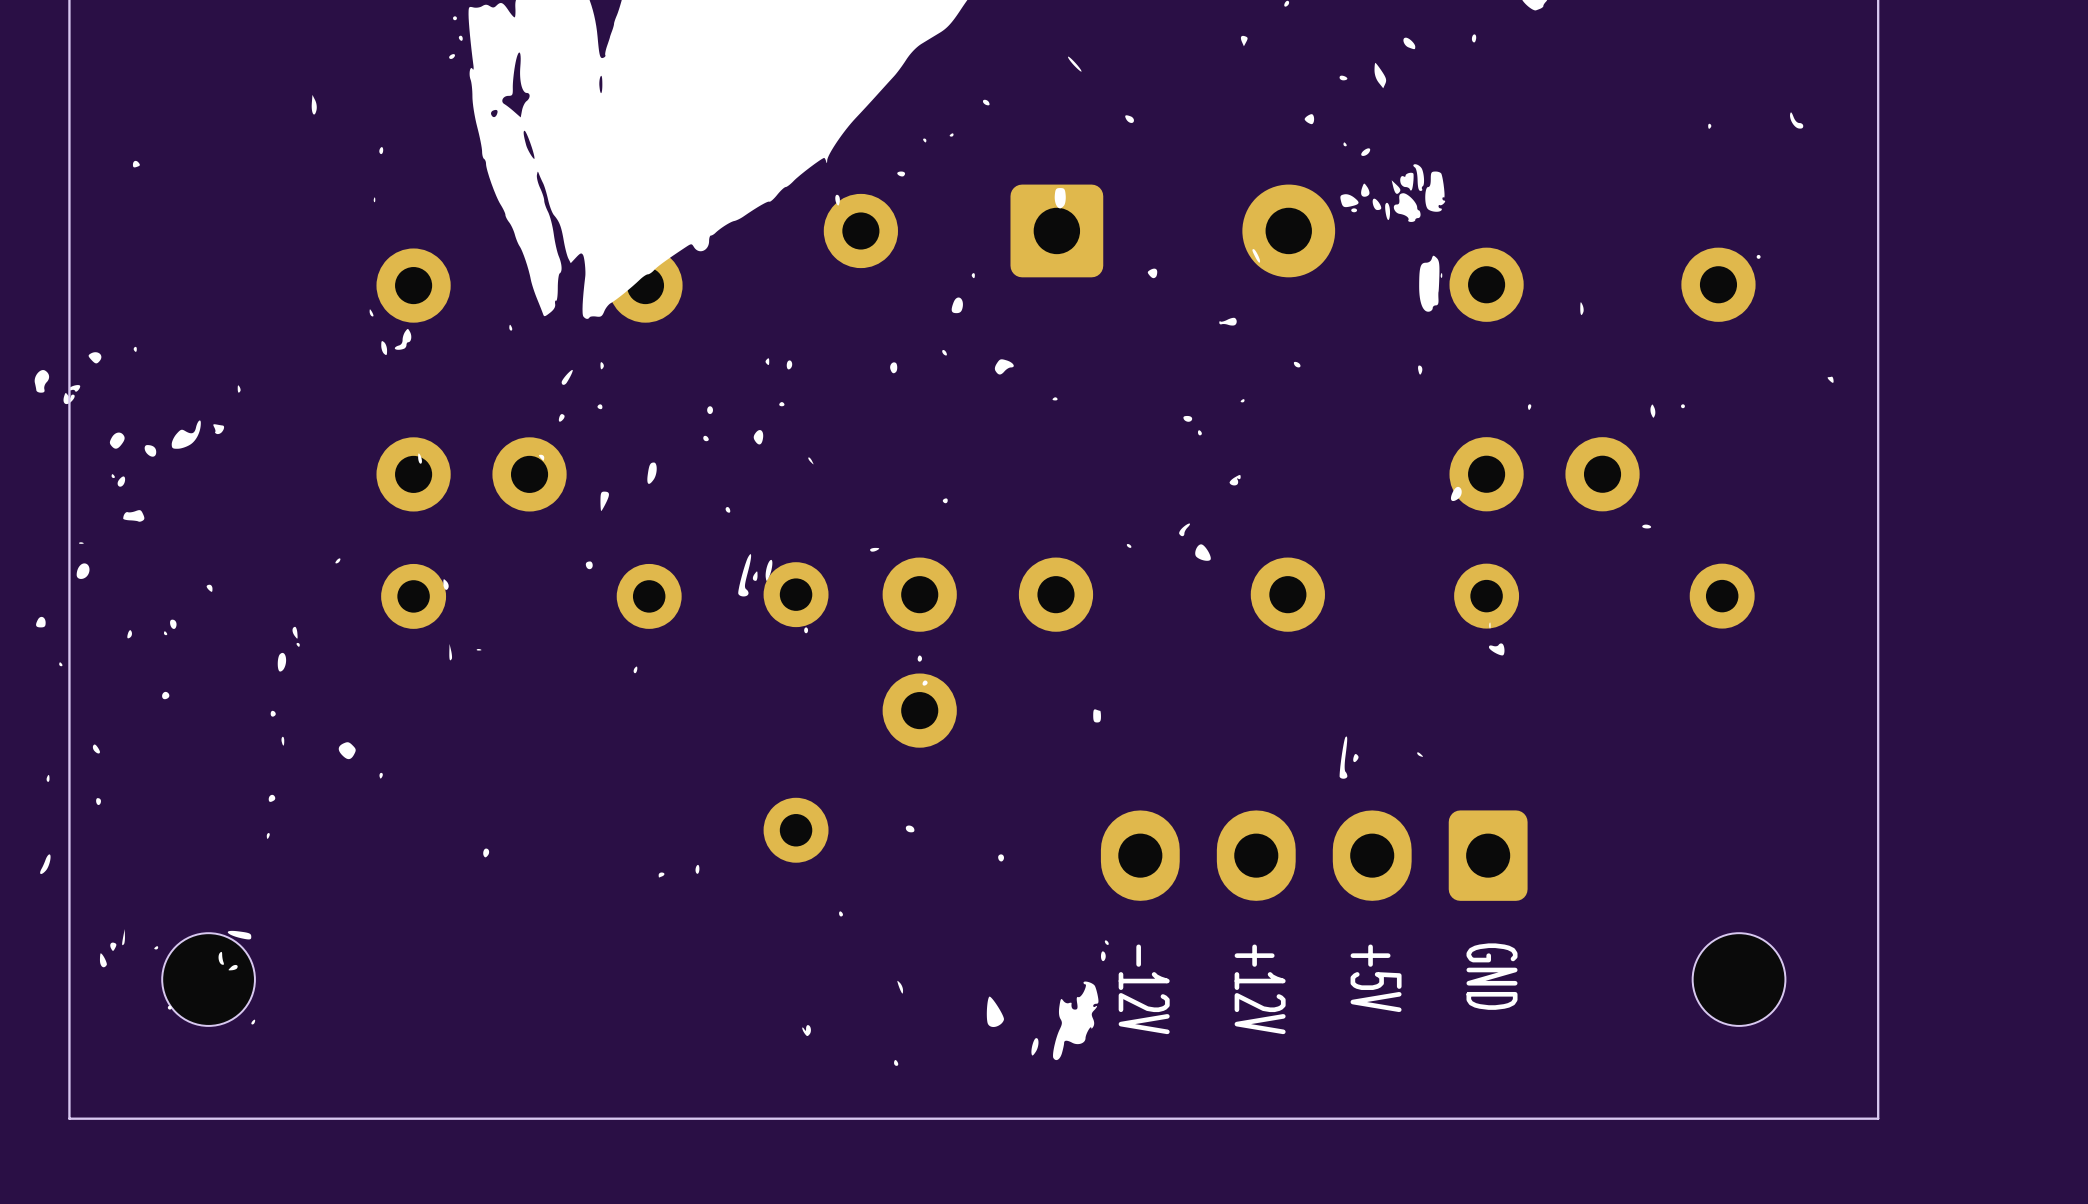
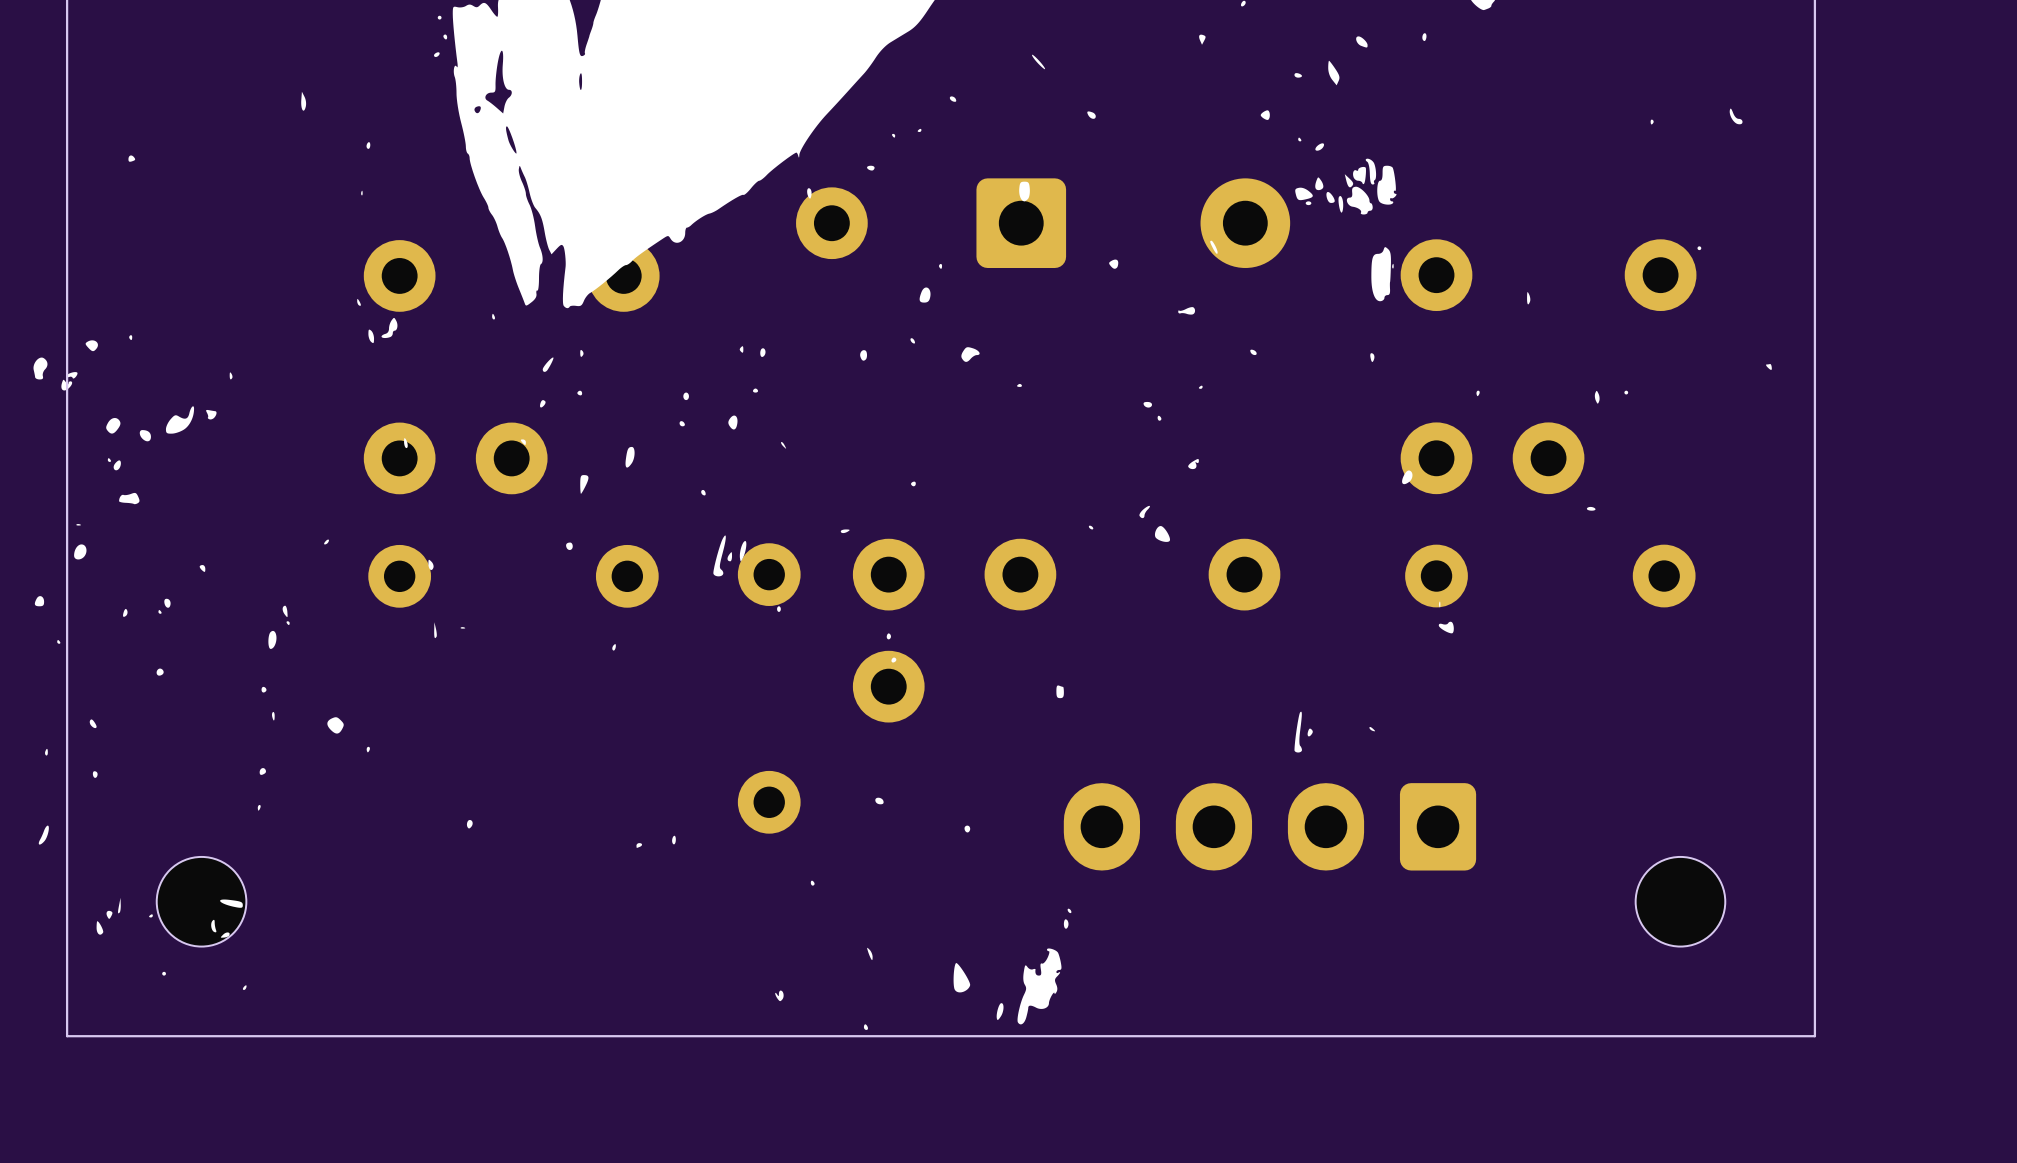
text: GND (1492, 976) -> none
text: +5V (1376, 978) -> none
part position: (208, 979) -> (201, 901)
part position: (1739, 979) -> (1680, 901)
text: -12V (1144, 989) -> none
text: +12V (1260, 989) -> none
board edge: (1878, 1072) (1878, 1118) (69, 1118) (69, 1072) -> (1814, 1036) (67, 1036)

